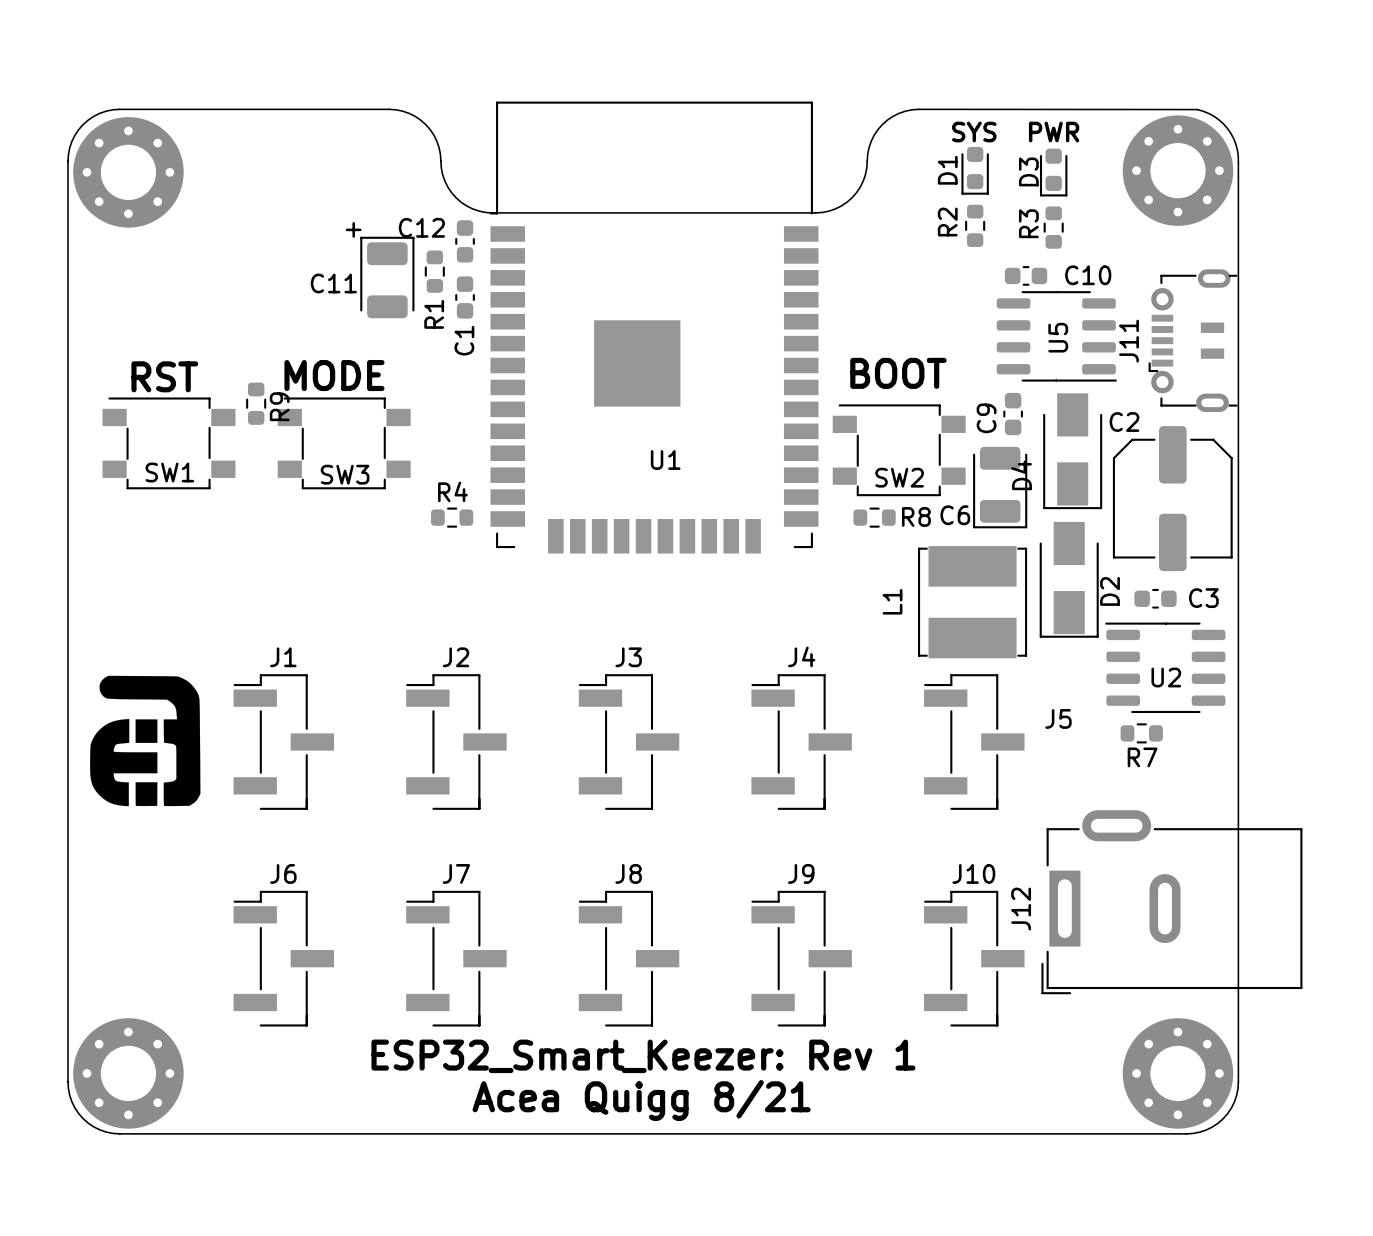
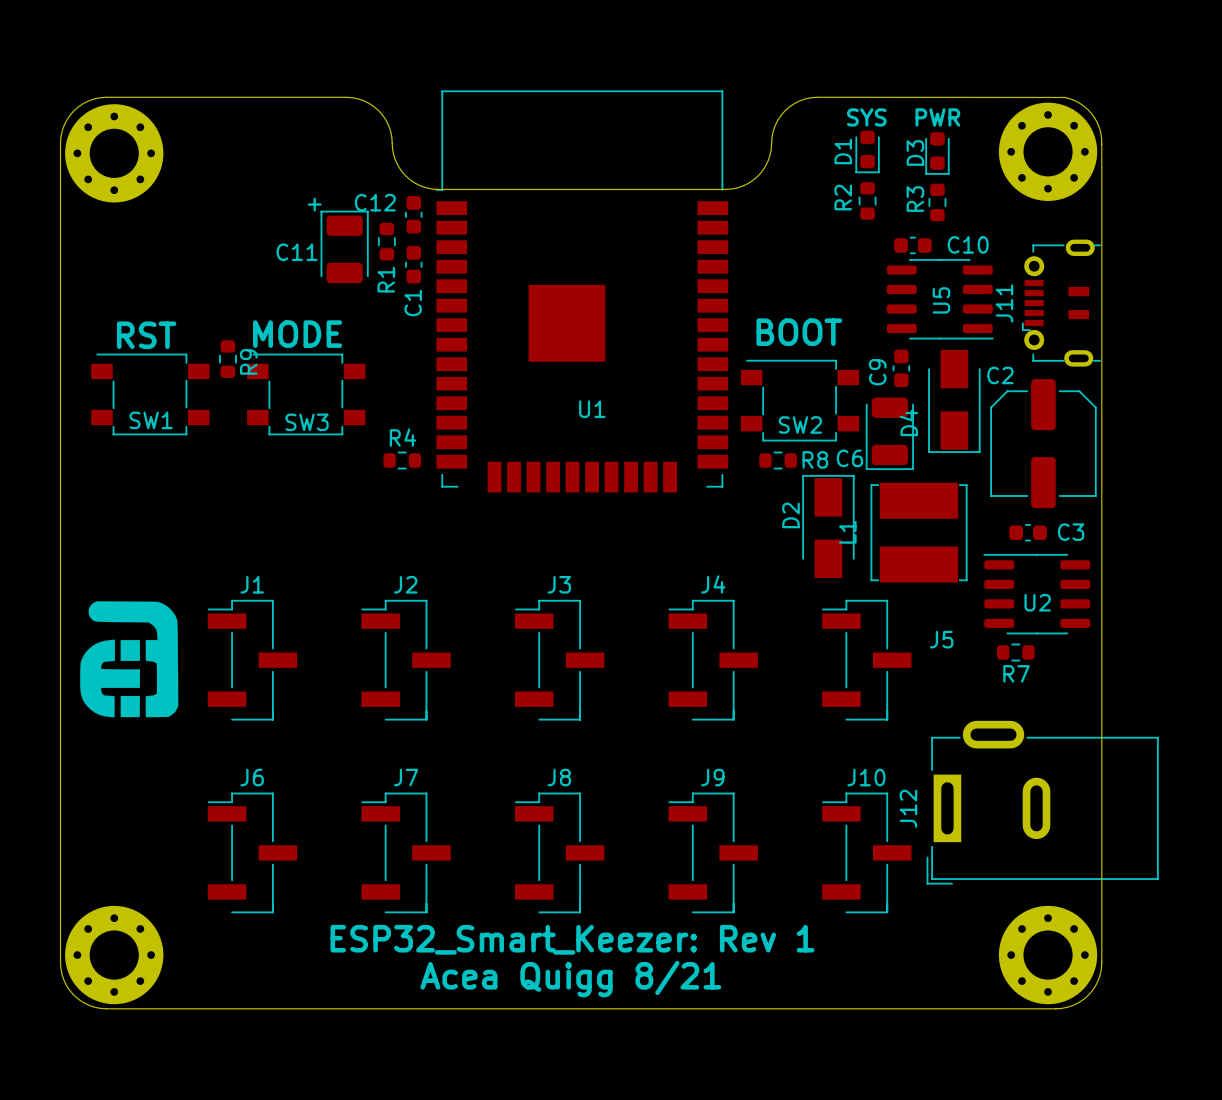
D2 rotation: 0° (1069, 579) -> 180° (828, 526)
D2 position: (1069, 579) -> (828, 526)
L1 position: (972, 602) -> (919, 532)

